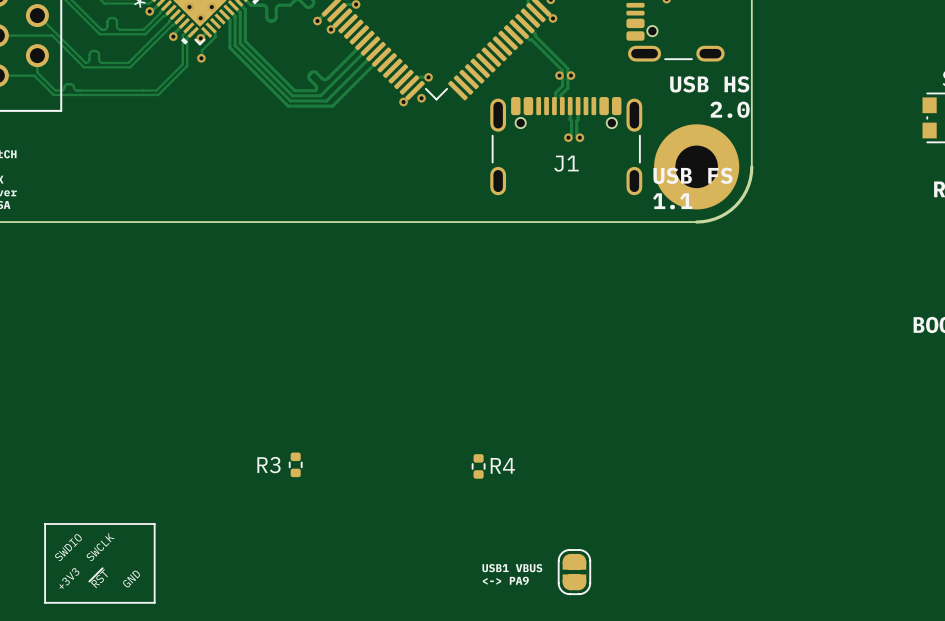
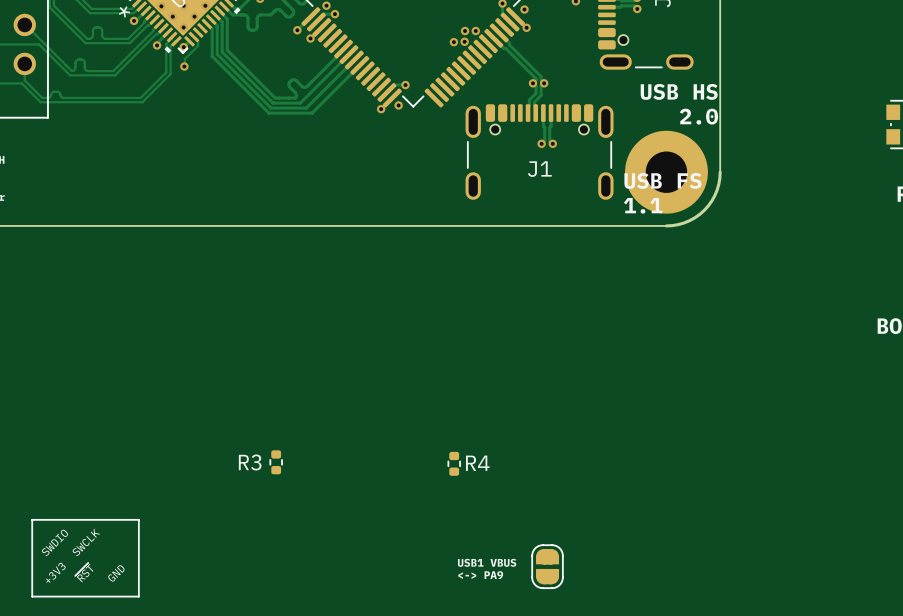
via: none -> (465, 31)
via: none -> (475, 31)
via: none -> (464, 41)
via: none -> (453, 42)

